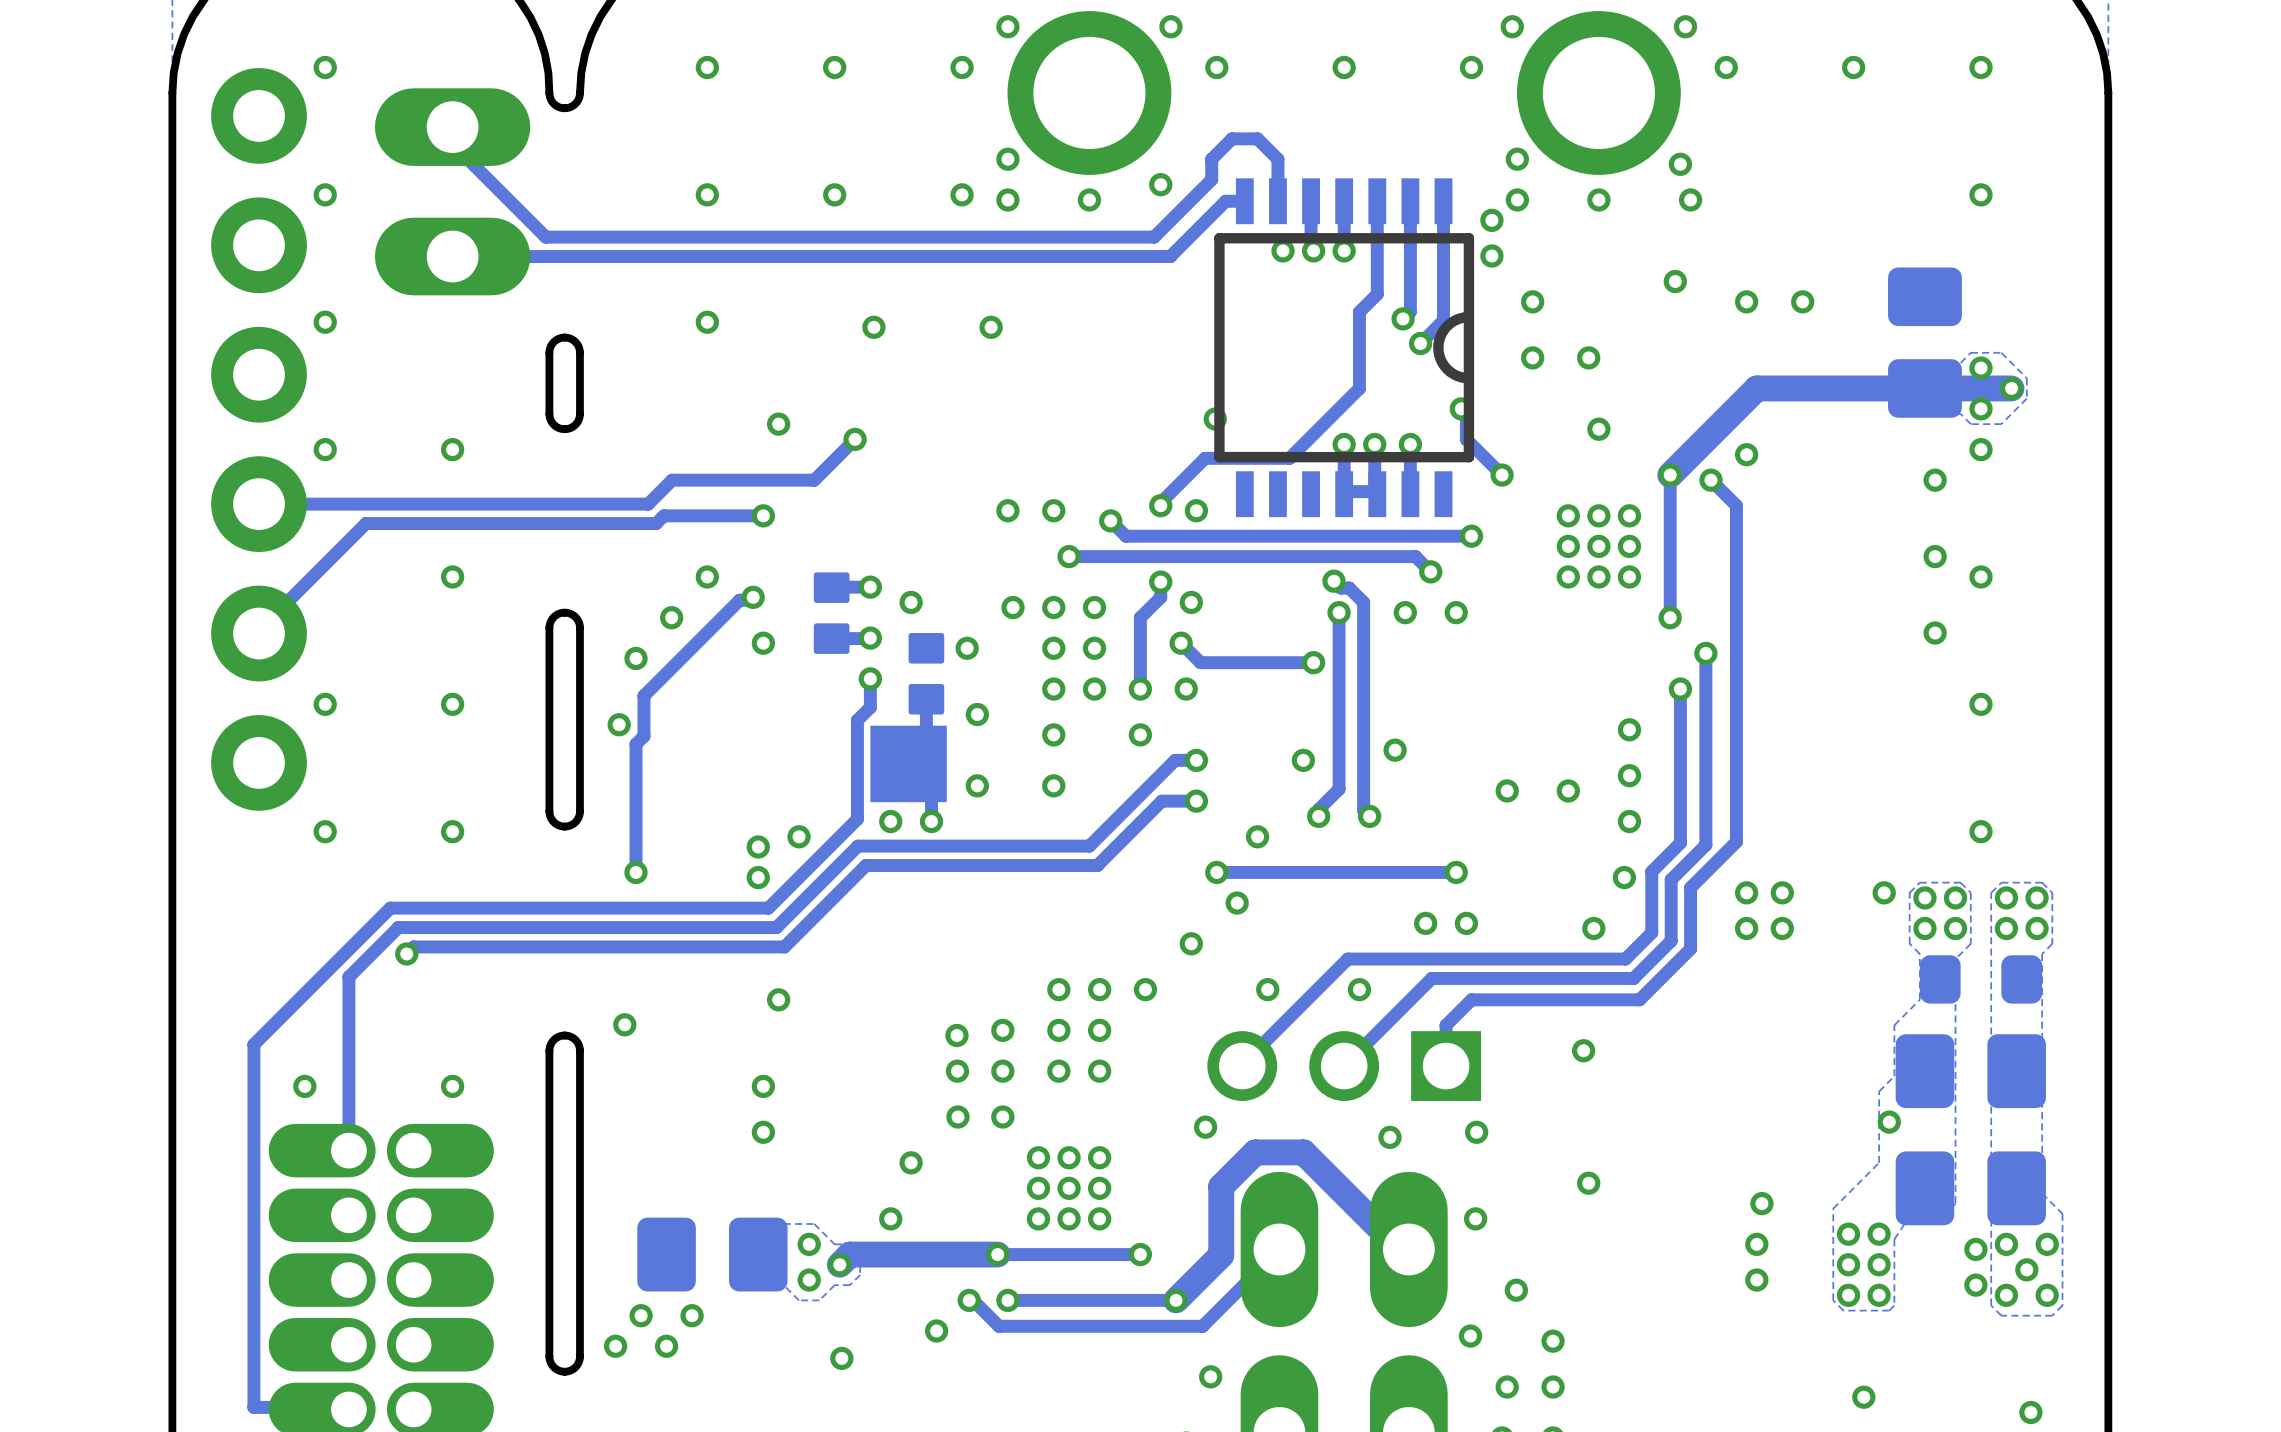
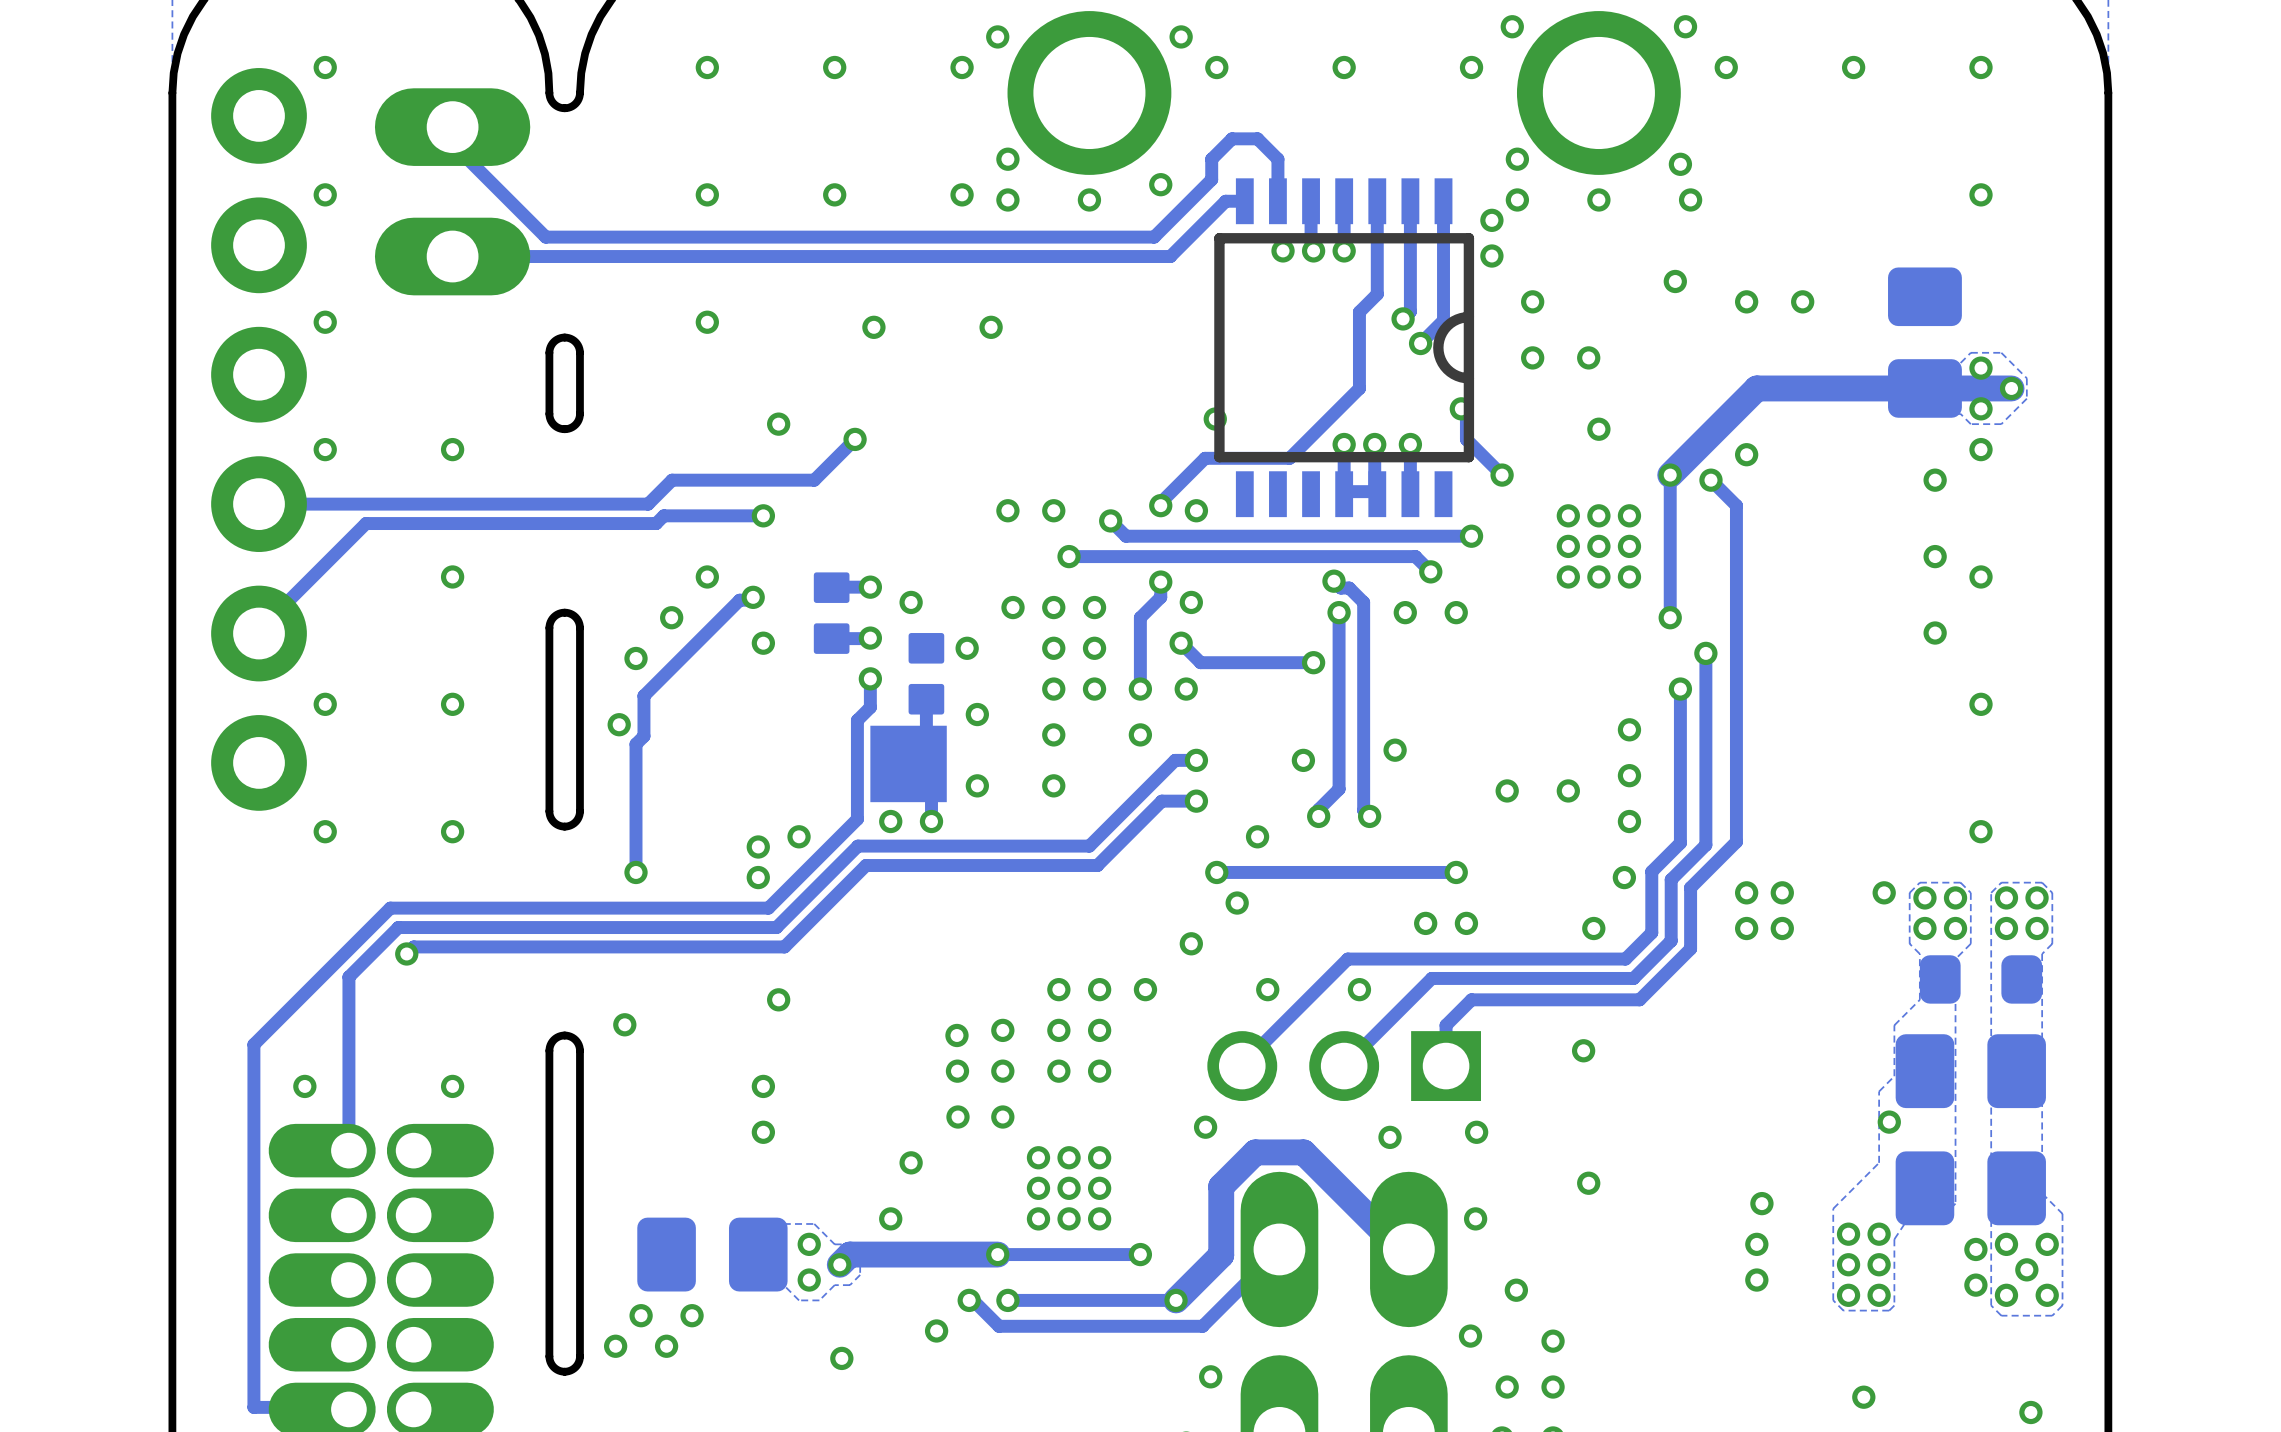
via position: (1007, 26) -> (997, 36)
via position: (1170, 26) -> (1181, 36)

